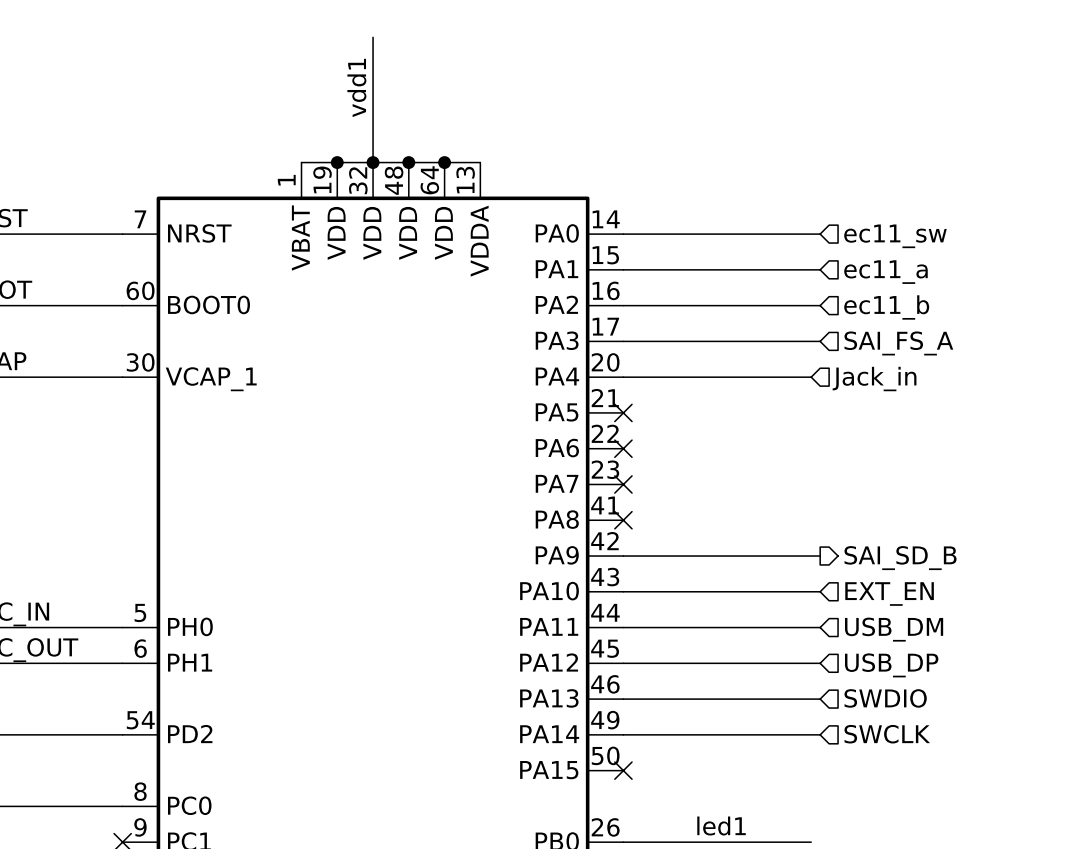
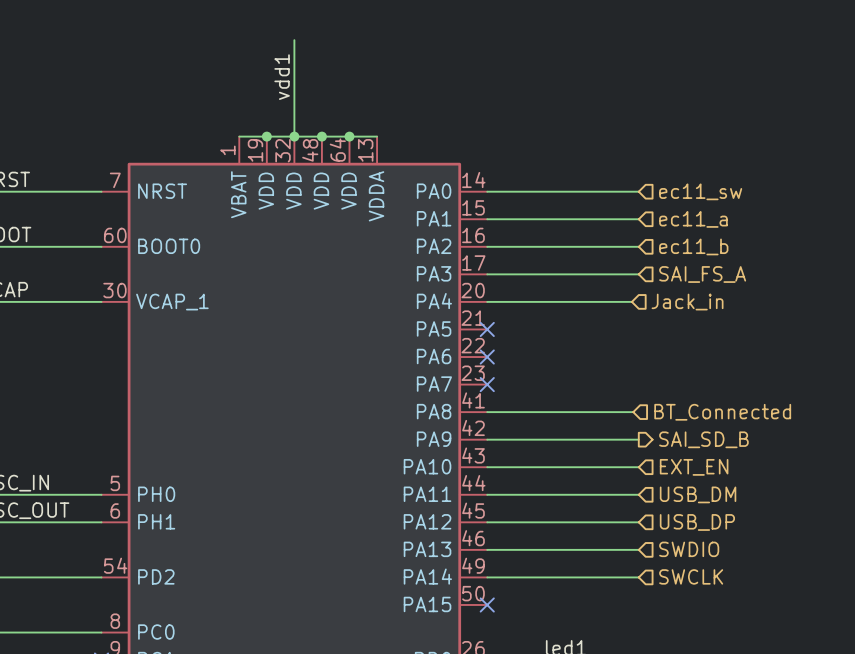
wire: none -> (487, 412) (633, 412)
no-connect mark: (623, 520) -> none
hierarchical label: none -> BT_Connected (722, 412)

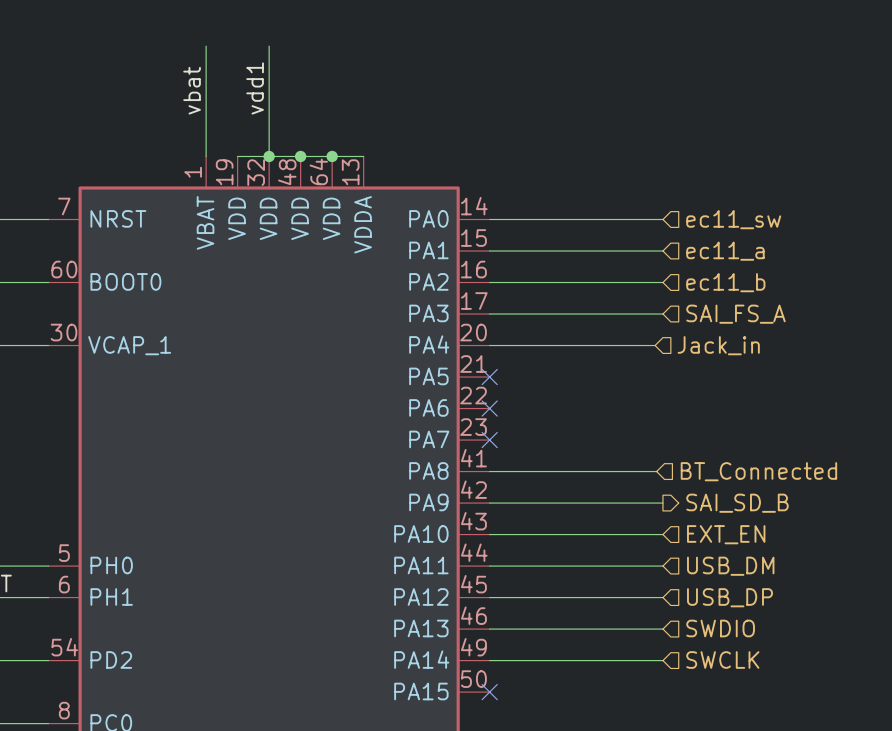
label: none -> vbat (192, 90)
wire: (239, 136) (266, 136) -> (206, 156) (206, 46)
junction: (266, 136) -> none

